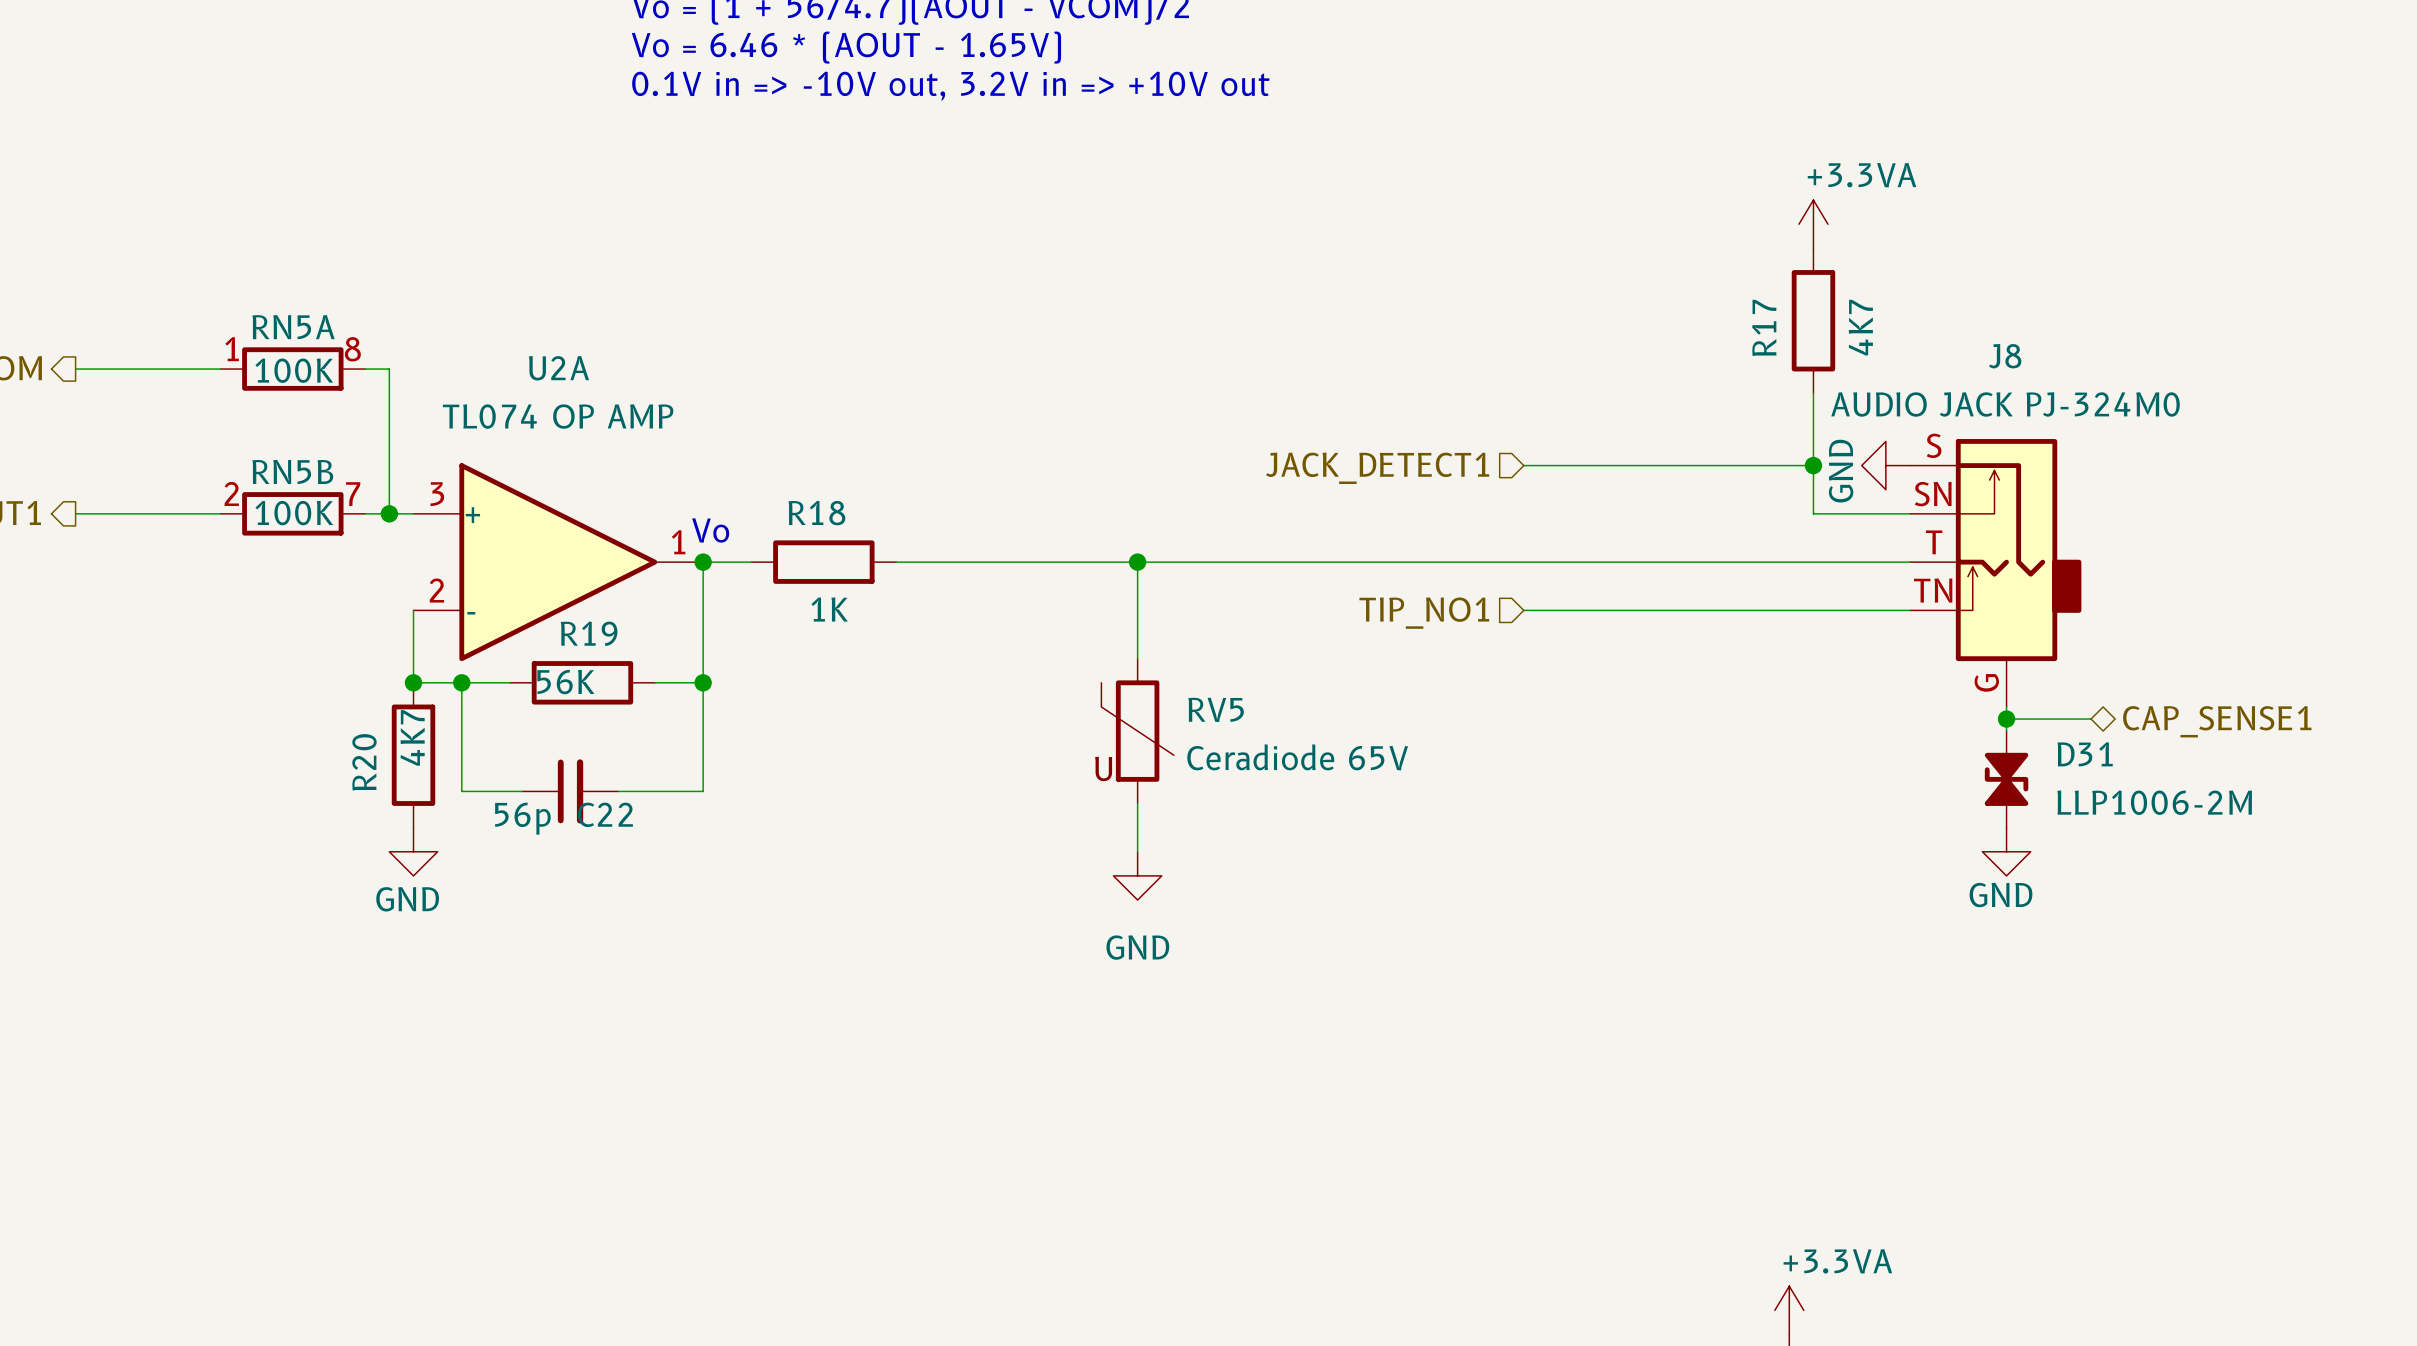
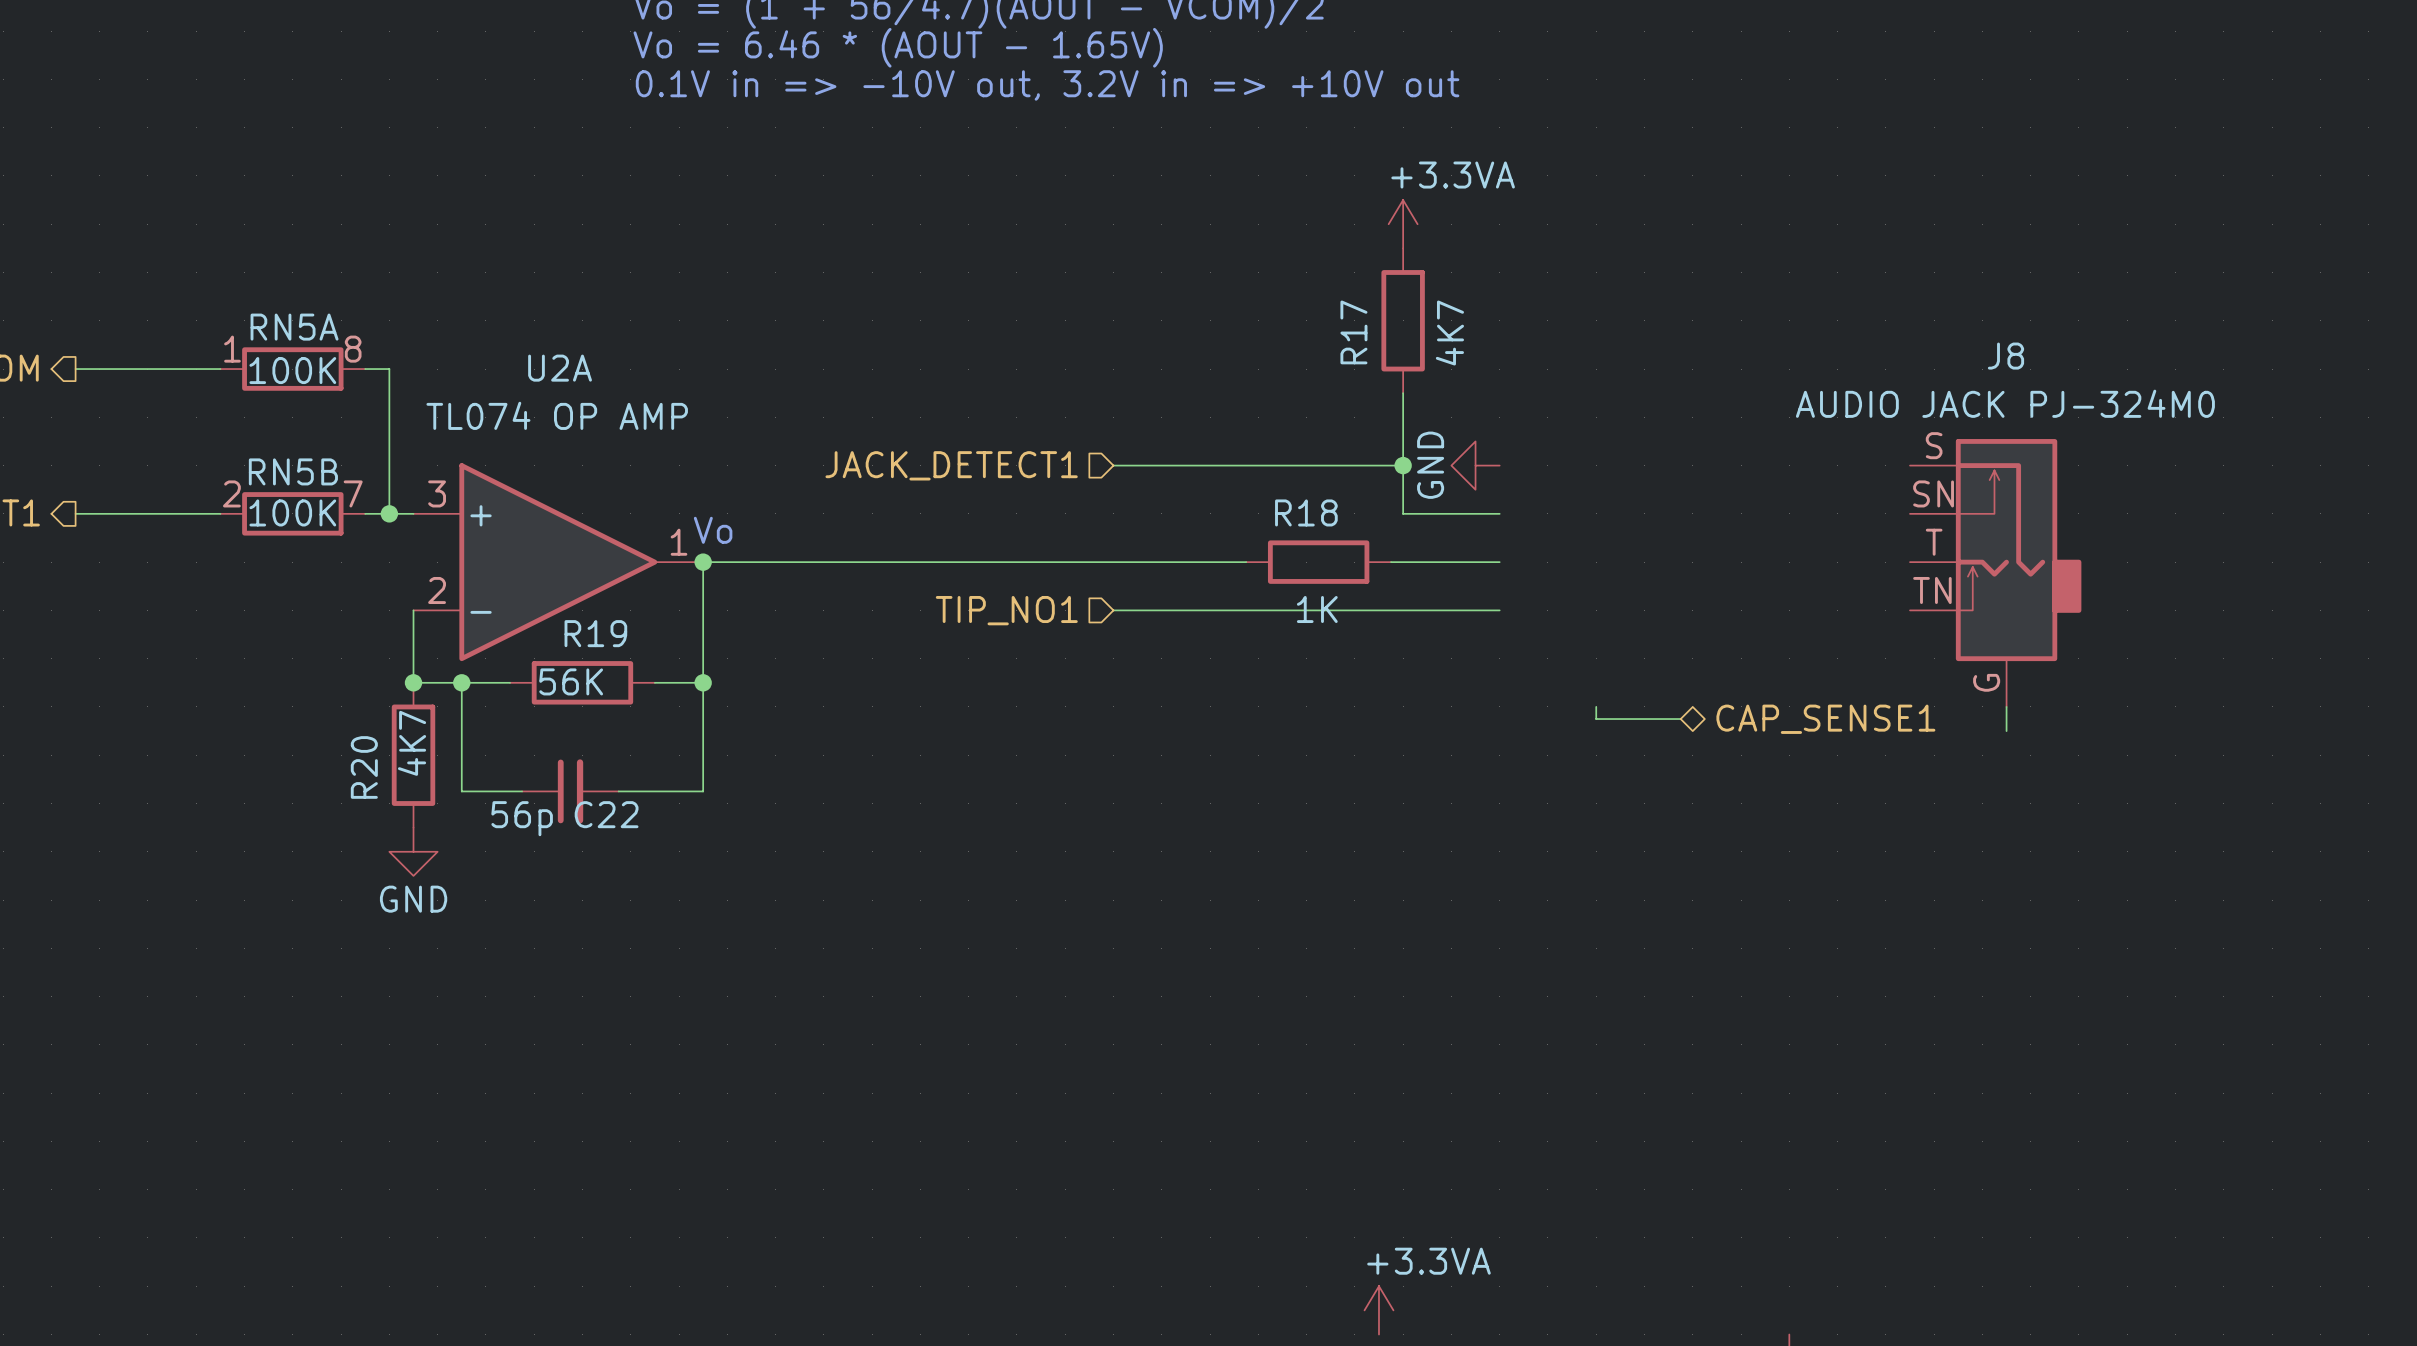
power symbol position: +3.3VA (1813, 224) -> +3.3VA (1403, 224)
R17 position: (1813, 320) -> (1403, 320)
wire: (1813, 393) (1813, 513) (1910, 513) -> (1403, 393) (1403, 513) (1499, 513)
junction: none -> (1403, 465)
power symbol: none -> GND (1475, 465)
wire: (1523, 465) (1813, 465) -> (1113, 465) (1403, 465)
junction: (1813, 465) -> none
power symbol: GND (1885, 465) -> none
hierarchical label position: JACK_DETECT1 (1377, 468) -> JACK_DETECT1 (951, 465)
wire: none -> (751, 562) (896, 562)
R18 position: (823, 562) -> (1318, 562)
wire: (1137, 562) (1137, 658) -> none
junction: (1137, 562) -> none
wire: (1246, 562) (1391, 562) -> none
wire: (1499, 562) (1910, 562) -> none
wire: (1523, 610) (1910, 610) -> (1113, 610) (1499, 610)
hierarchical label position: TIP_NO1 (1424, 613) -> TIP_NO1 (1006, 610)
wire: none -> (1596, 706) (1596, 719) (1680, 719)
wire: (2006, 719) (2091, 719) -> none
junction: (2006, 719) -> none
hierarchical label position: CAP_SENSE1 (2217, 721) -> CAP_SENSE1 (1825, 719)
RV5: Ceradiode 65V (1137, 731) -> none
D31: LLP1006-2M (2006, 779) -> none
wire: (1137, 803) (1137, 851) -> none
power symbol: GND (2006, 851) -> none
power symbol: GND (1137, 875) -> none
power symbol position: +3.3VA (1789, 1310) -> +3.3VA (1378, 1310)

